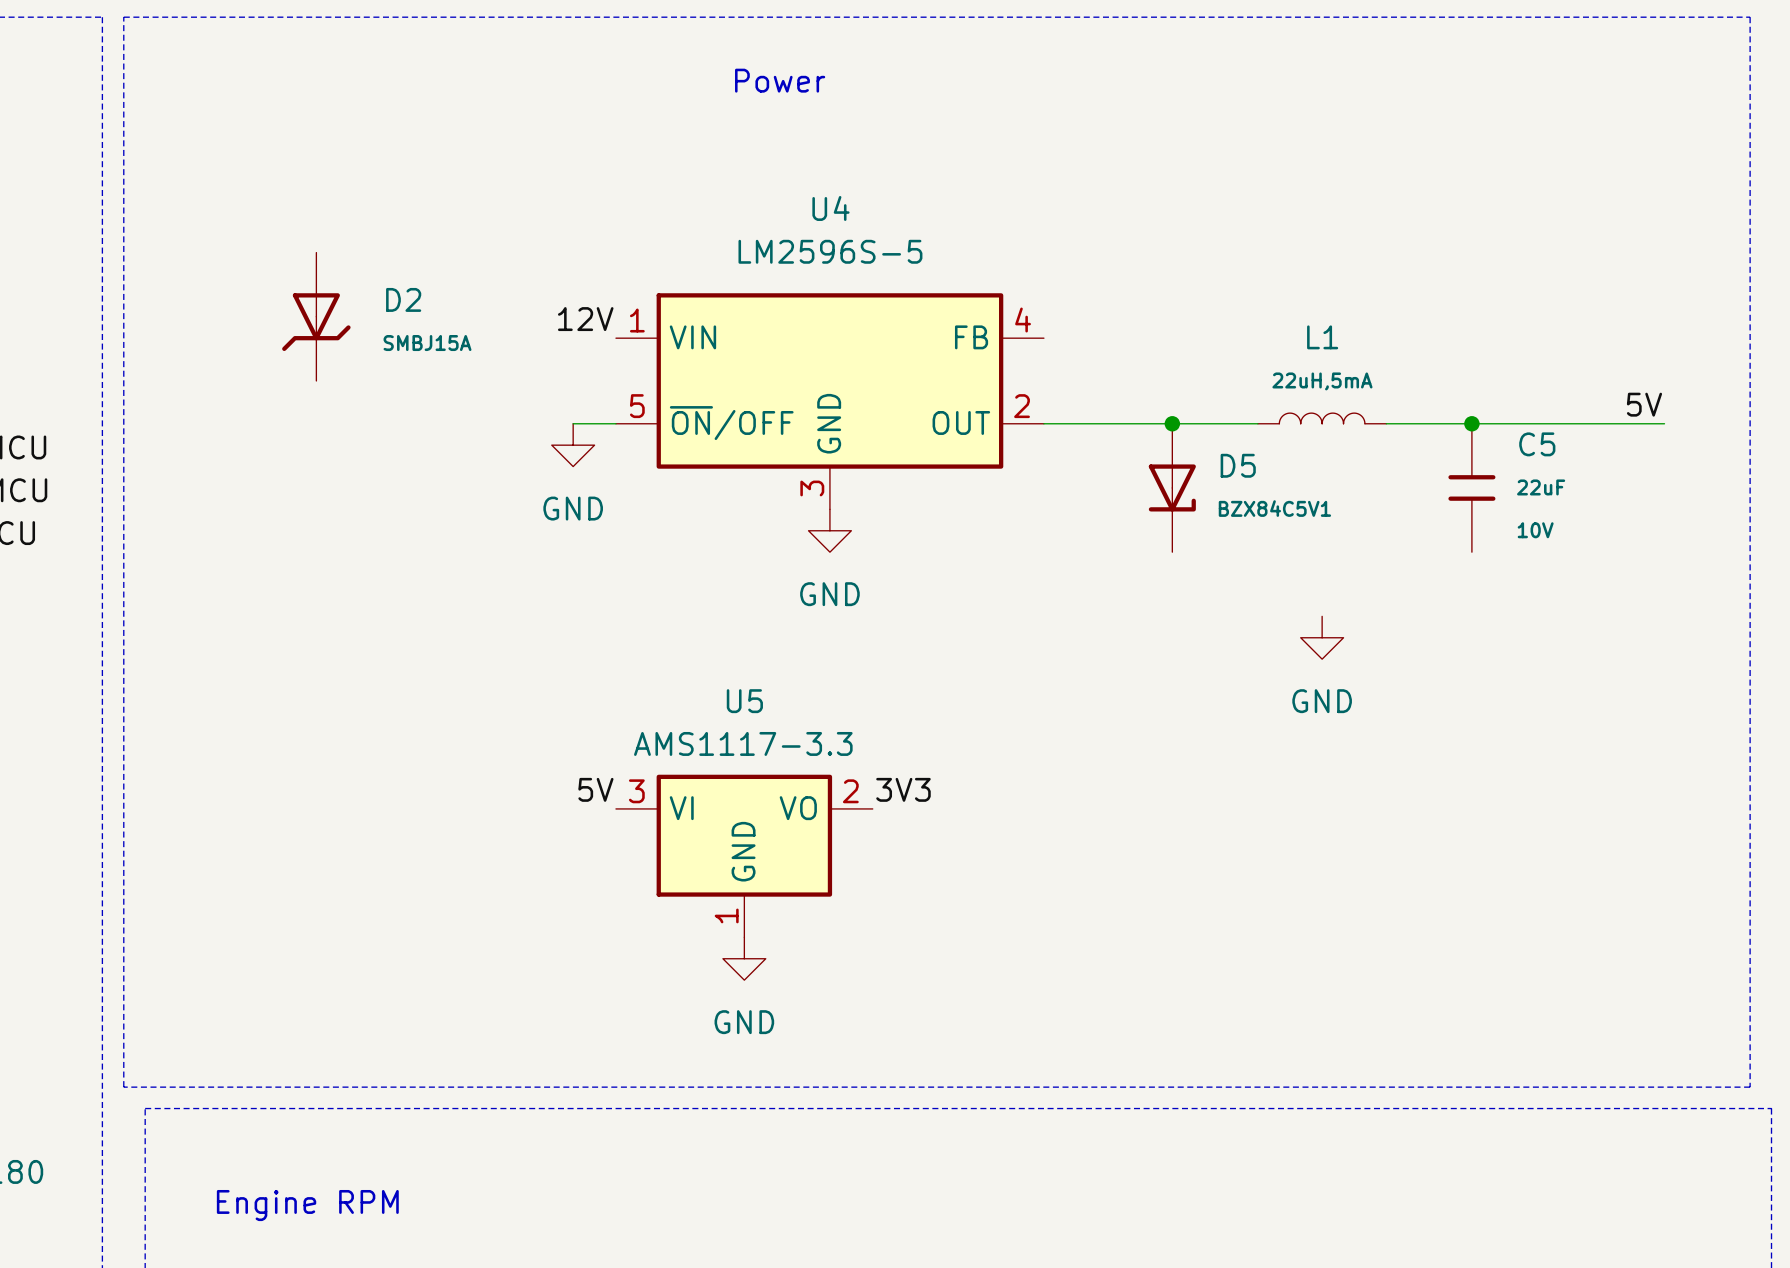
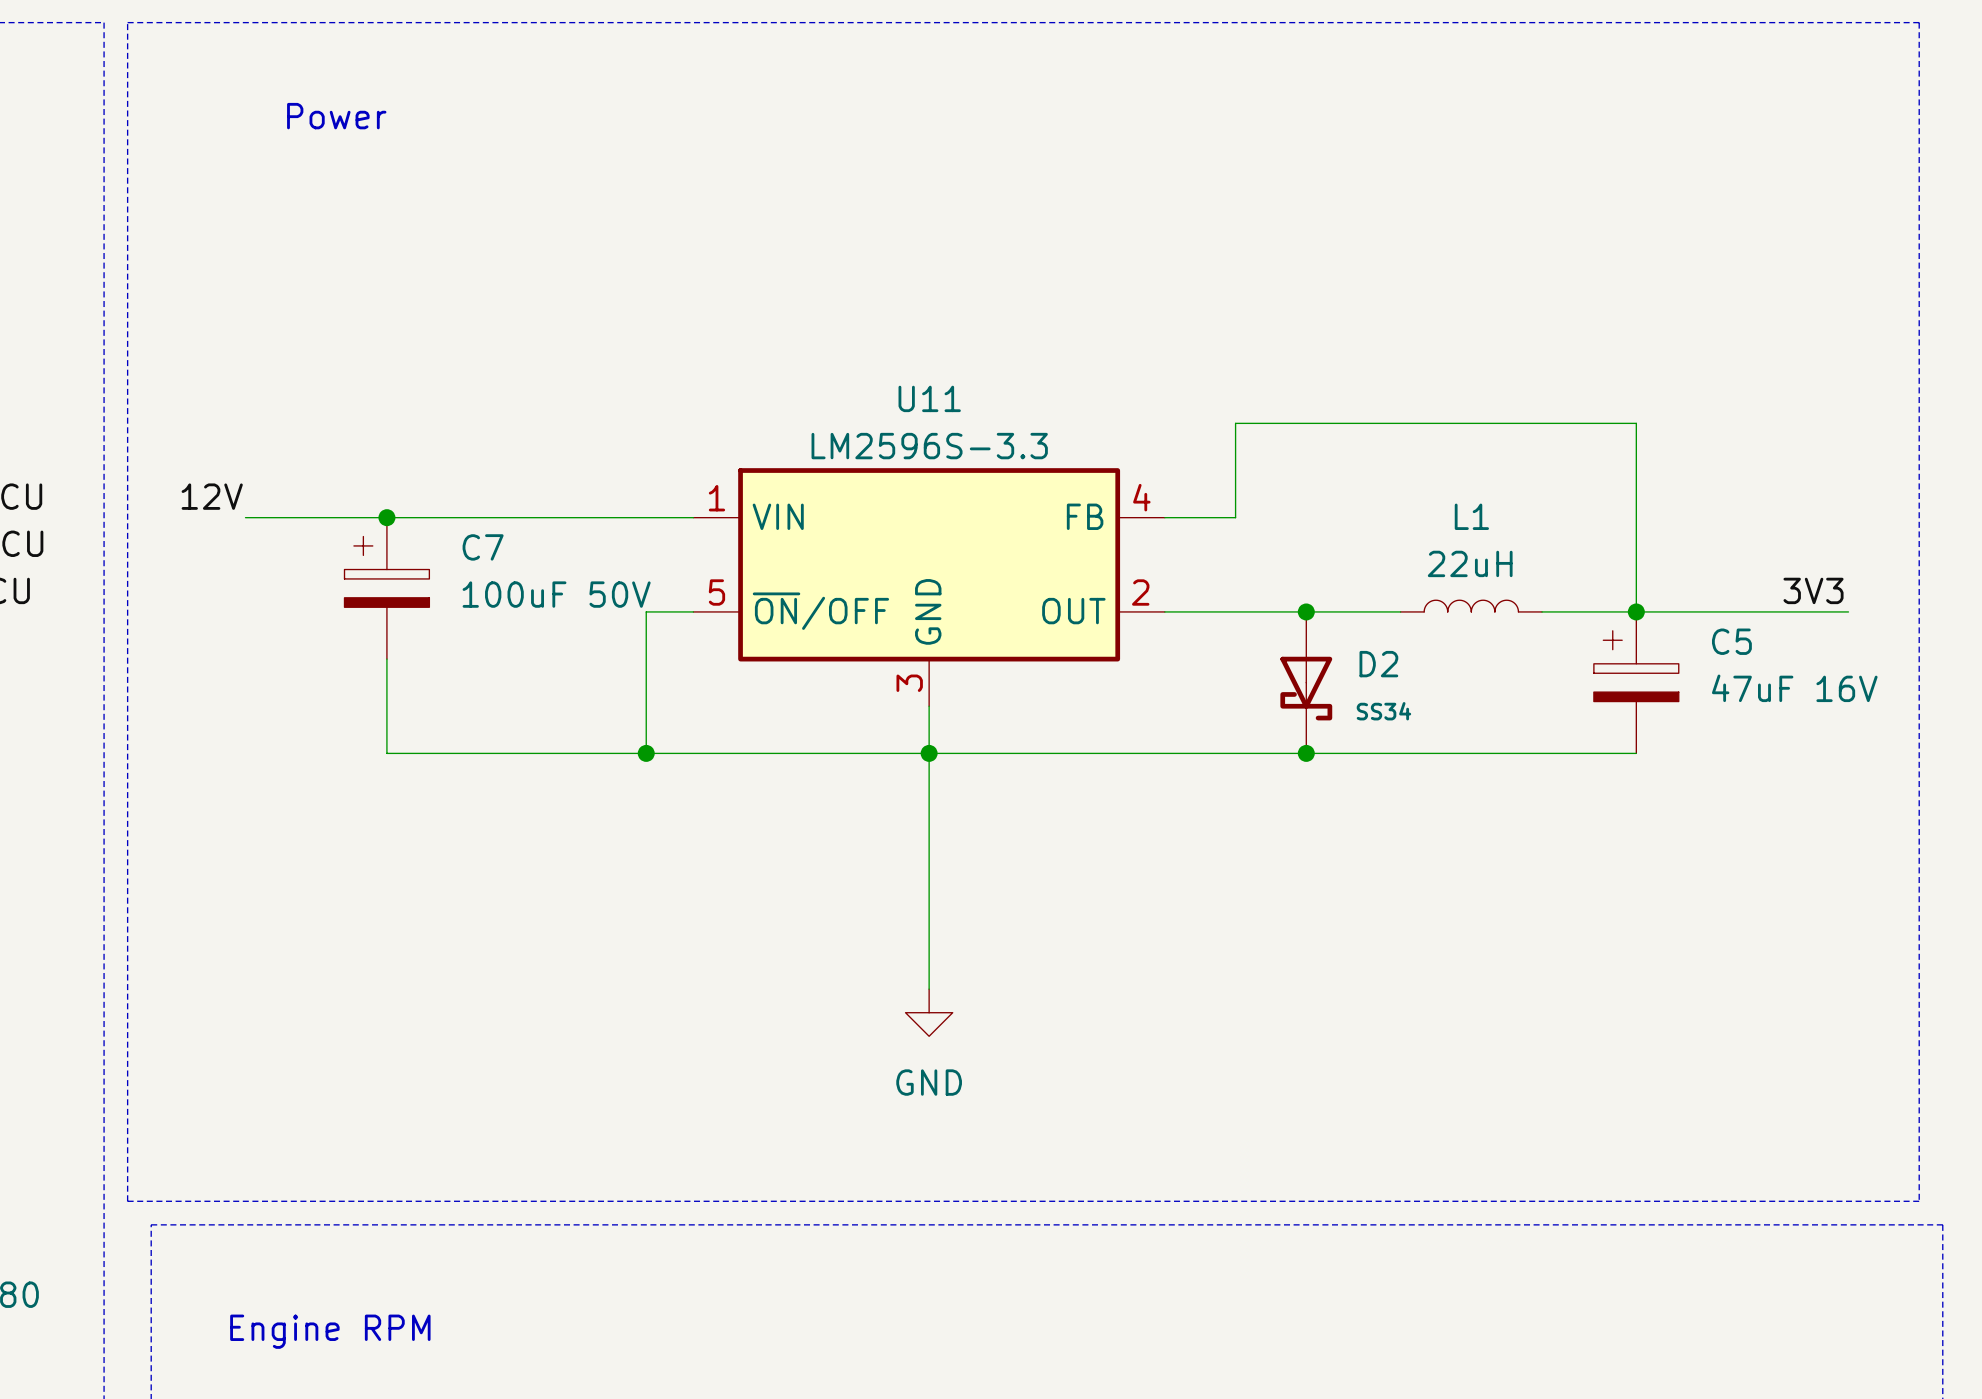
text: Power (780, 80) -> none
text: none -> Power (336, 116)
D2 symbol: [282, 252, 351, 381] -> [1280, 611, 1333, 754]
label position: 12V (585, 319) -> 12V (212, 496)
D2 value: SMBJ15A (427, 343) -> SS34 (1383, 711)
L1 value: 22uH,5mA (1322, 381) -> 22uH (1470, 563)
U4: LM2596S-5 (829, 401) -> none
label: 5V (1644, 404) -> none
L1 position: (1322, 418) -> (1471, 606)
wire: (573, 423) (615, 423) -> none
wire: (1043, 423) (1257, 423) -> (1164, 611) (1400, 611)
junction: (1172, 423) -> none
wire: (1386, 423) (1664, 423) -> (1542, 611) (1848, 611)
C5 symbol: [1448, 423, 1496, 553] -> [1593, 611, 1679, 754]
junction: (1471, 423) -> none
power symbol: GND (573, 445) -> none
wire: none -> (245, 517) (693, 517)
junction: none -> (386, 517)
wire: none -> (1164, 517) (1235, 517) (1235, 423) (1636, 423) (1636, 611)
D5: BZX84C5V1 (1172, 487) -> none
C5 value: 22uF (1541, 487) -> 47uF 16V (1794, 688)
U11: none -> LM2596S-3.3 (929, 587)
C7: none -> 100uF 50V (386, 588)
power symbol: GND (829, 530) -> none
C5 text: 10V (1535, 530) -> none
label: none -> 3V3 (1813, 590)
wire: none -> (693, 611) (646, 611) (646, 753)
junction: none -> (1306, 611)
junction: none -> (1636, 611)
wire: none -> (386, 659) (386, 753) (1636, 753)
wire: none -> (929, 706) (929, 989)
power symbol: GND (1322, 637) -> none
junction: none -> (646, 753)
junction: none -> (929, 753)
junction: none -> (1306, 753)
label: 5V (595, 789) -> none
label: 3V3 (903, 789) -> none
U5: AMS1117-3.3 (744, 856) -> none
power symbol position: GND (744, 958) -> GND (929, 1012)

